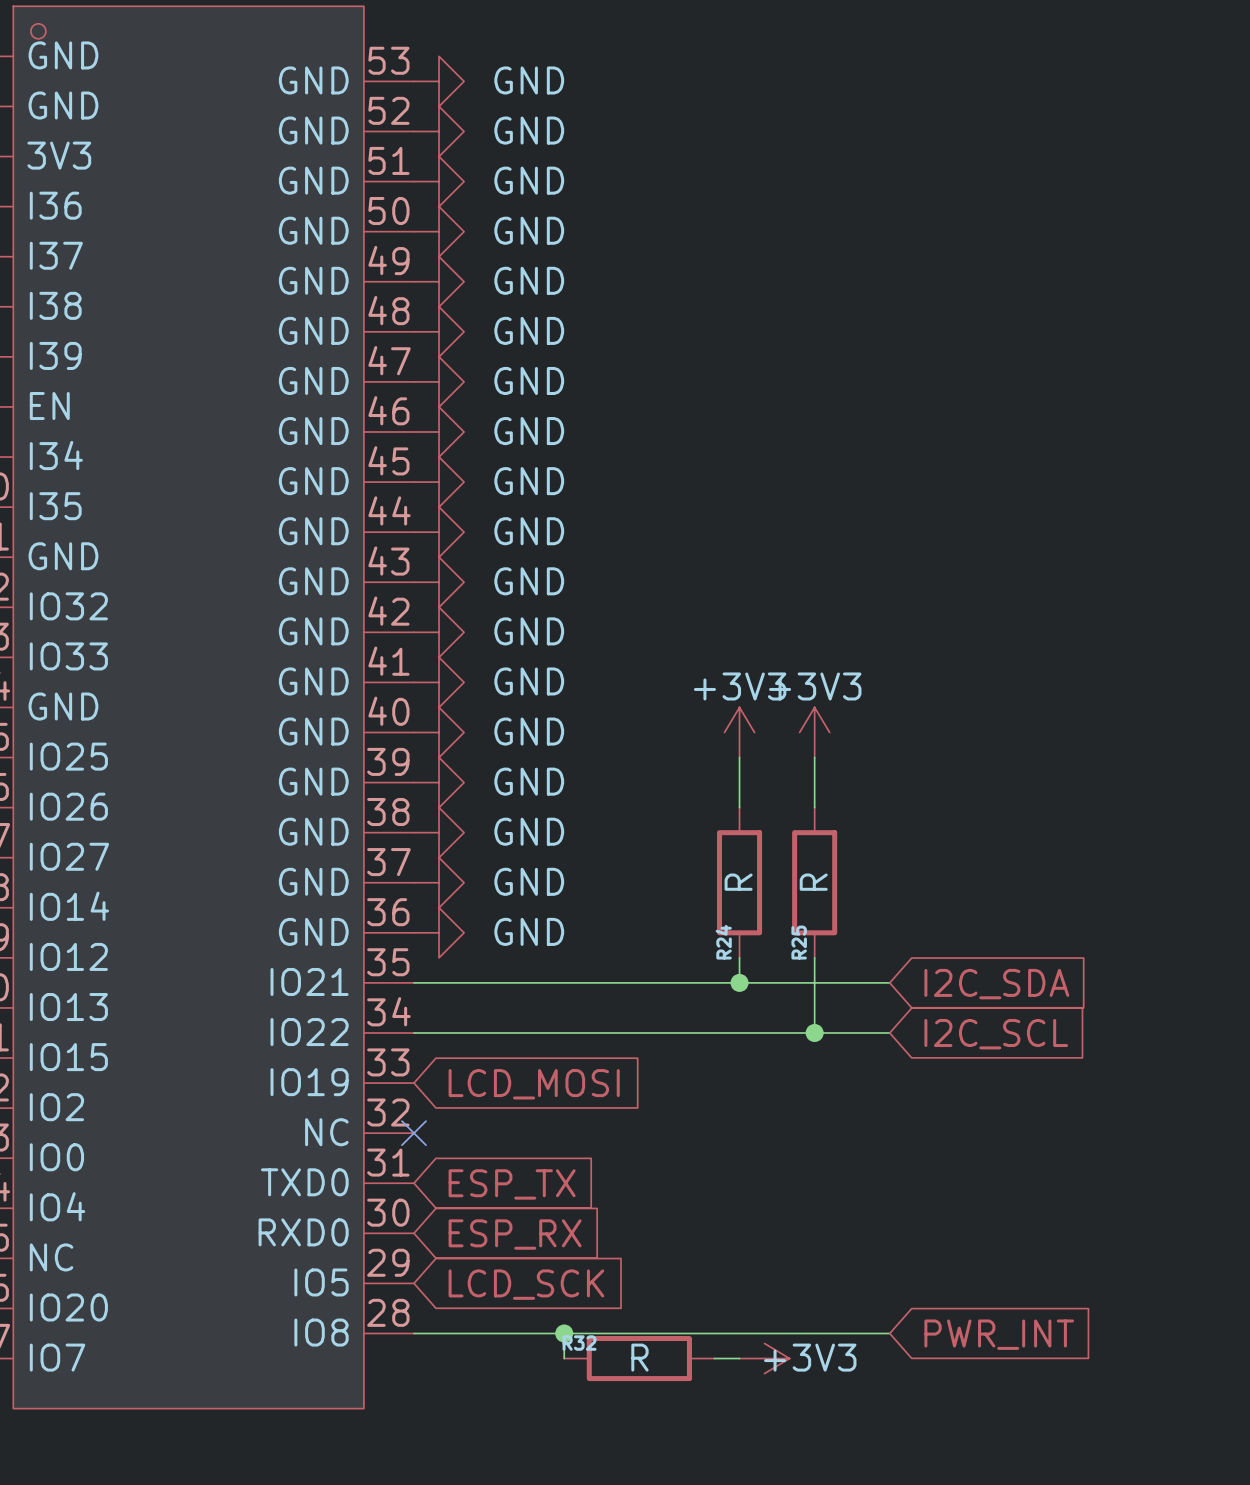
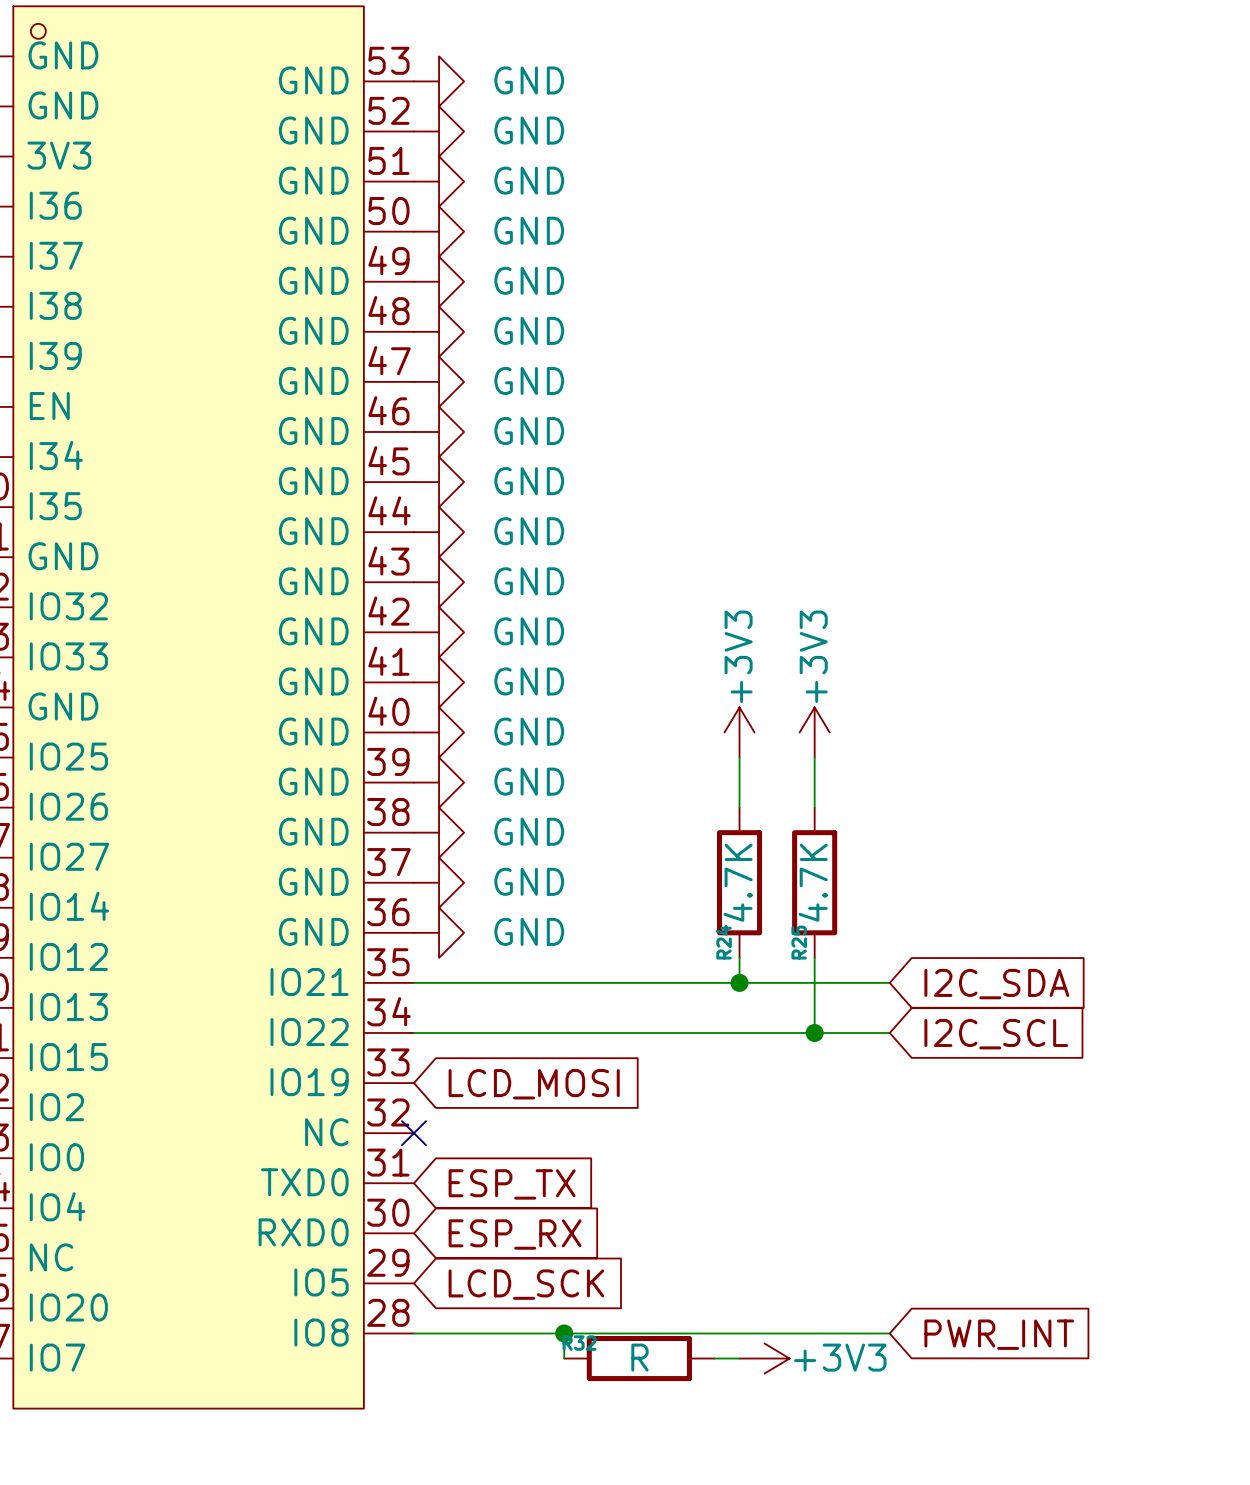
power symbol text rotation: 0° (740, 686) -> 90° counterclockwise (738, 656)
power symbol text rotation: 0° (815, 686) -> 90° counterclockwise (813, 656)
R24 value: R (738, 882) -> 4.7K (737, 882)
R25 value: R (813, 882) -> 4.7K (813, 882)
power symbol text position: +3V3 (810, 1357) -> +3V3 (840, 1357)

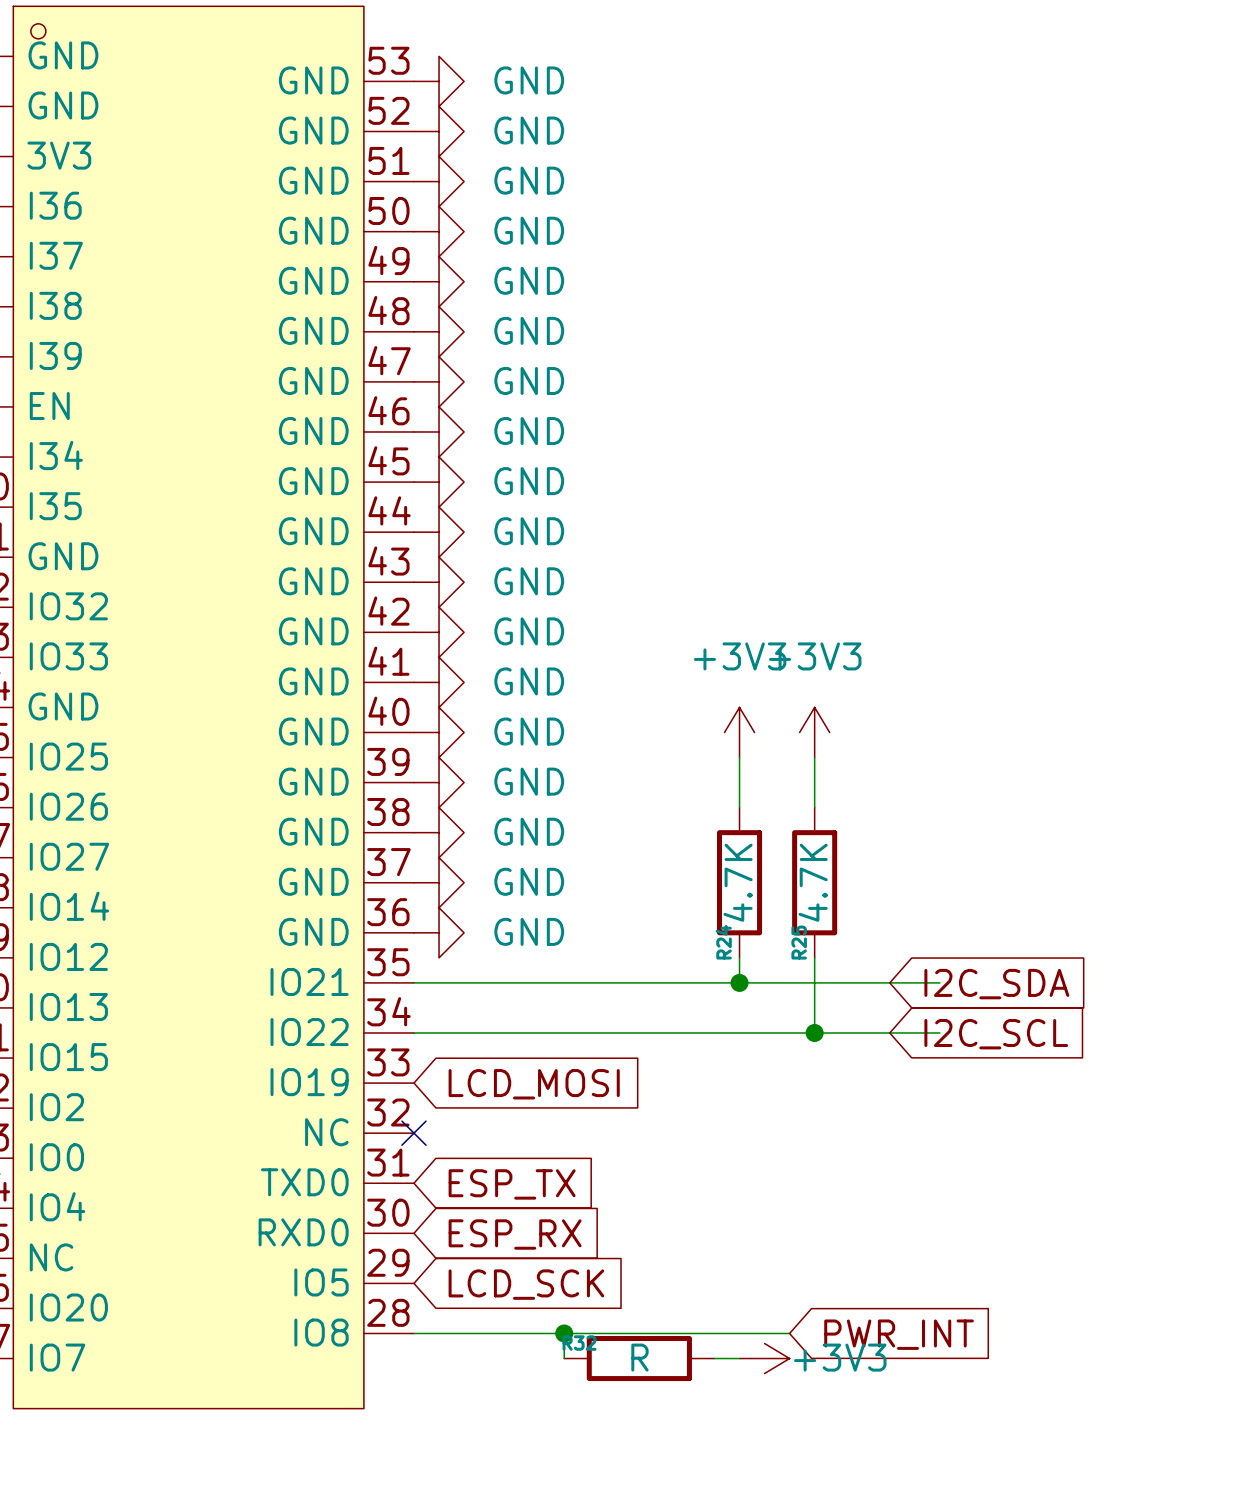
power symbol text rotation: 0° (738, 656) -> 90° clockwise (740, 656)
power symbol text rotation: 0° (813, 656) -> 90° clockwise (815, 656)
wire: none -> (889, 982) (939, 982)
wire: none -> (889, 1032) (939, 1032)
wire: (789, 1333) (889, 1333) -> none
global label position: PWR_INT (999, 1334) -> PWR_INT (899, 1334)

